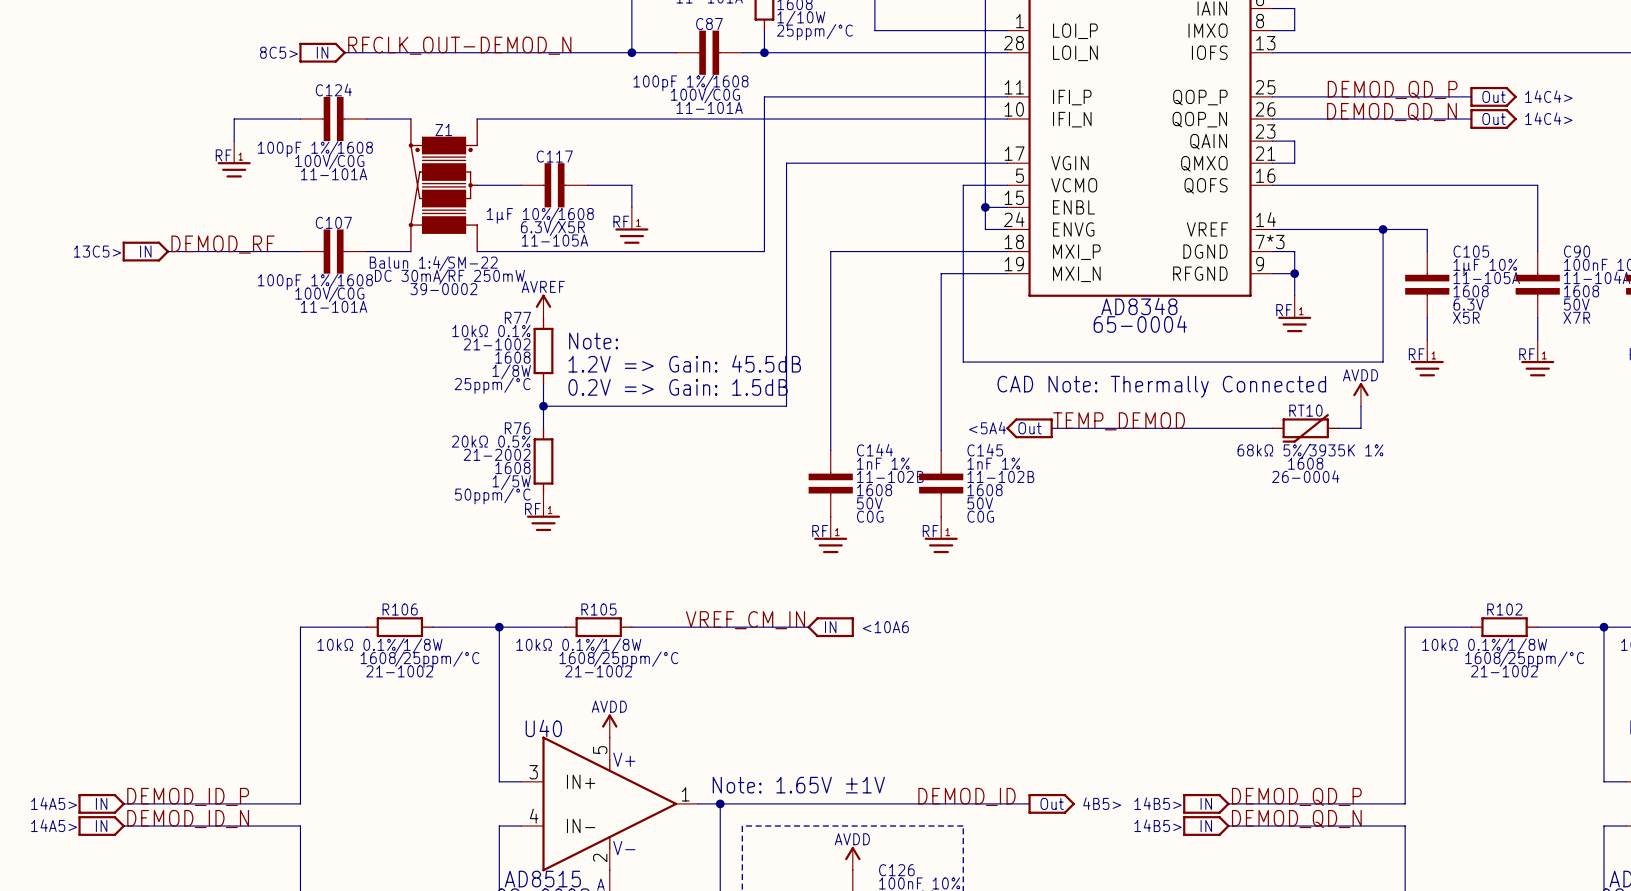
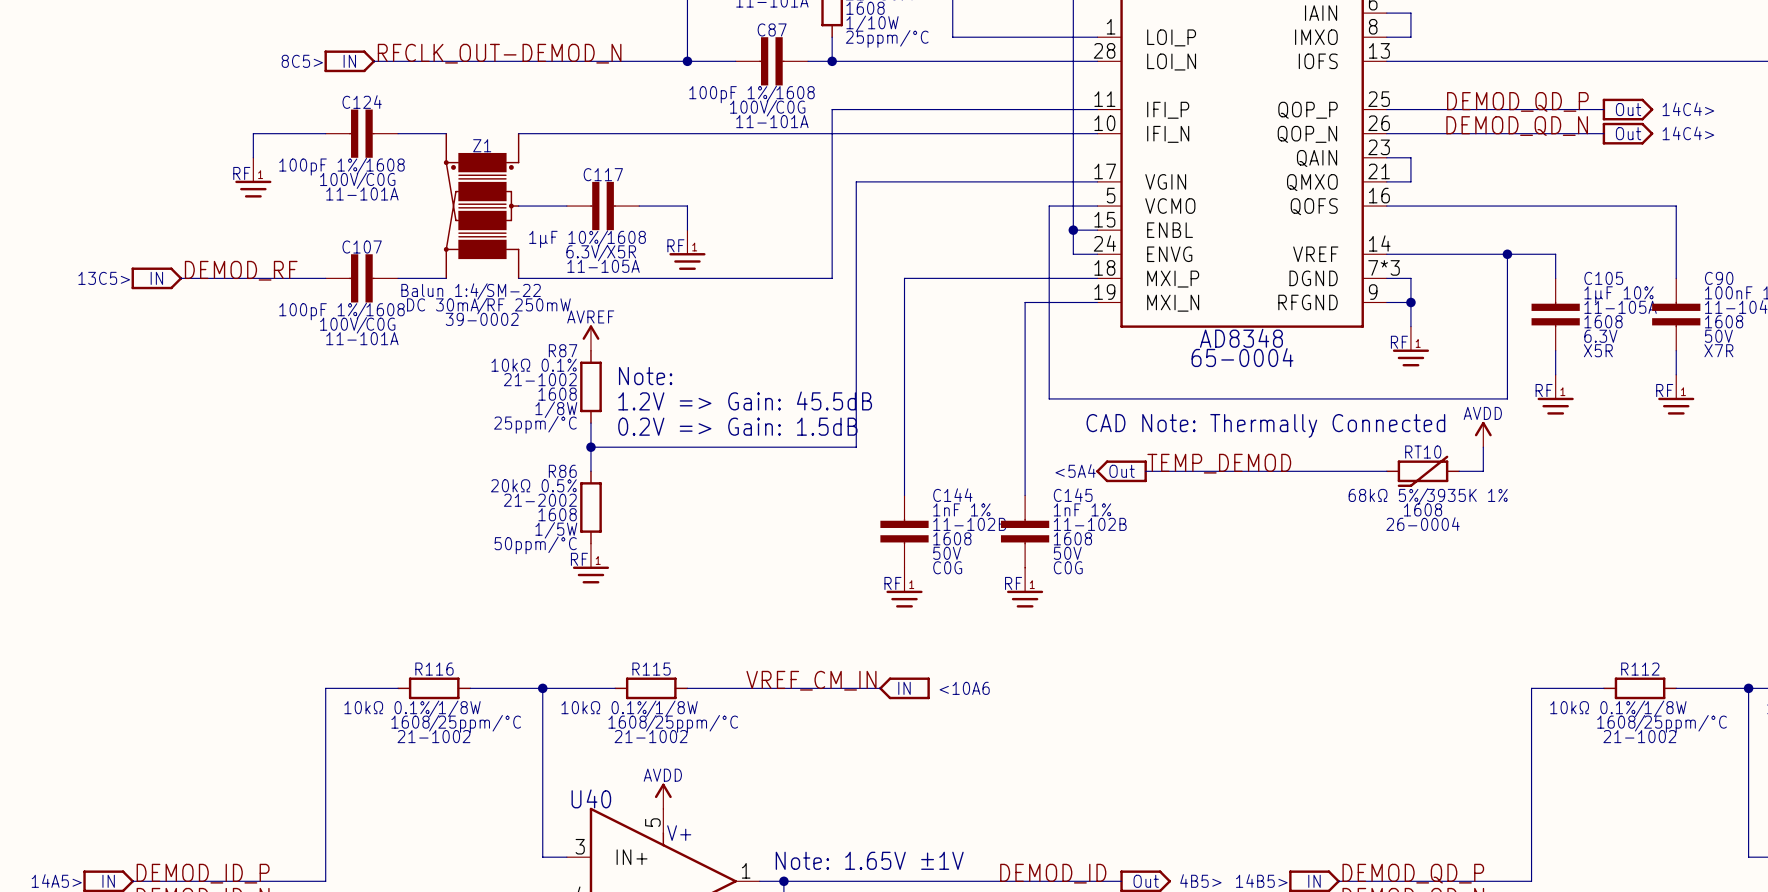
R77 name: R77 (517, 317) -> R87 (563, 350)
R76 name: R76 (517, 428) -> R86 (562, 471)
R106 name: R106 (400, 609) -> R116 (434, 669)
R105 name: R105 (598, 609) -> R115 (651, 669)
R102 name: R102 (1504, 609) -> R112 (1640, 669)

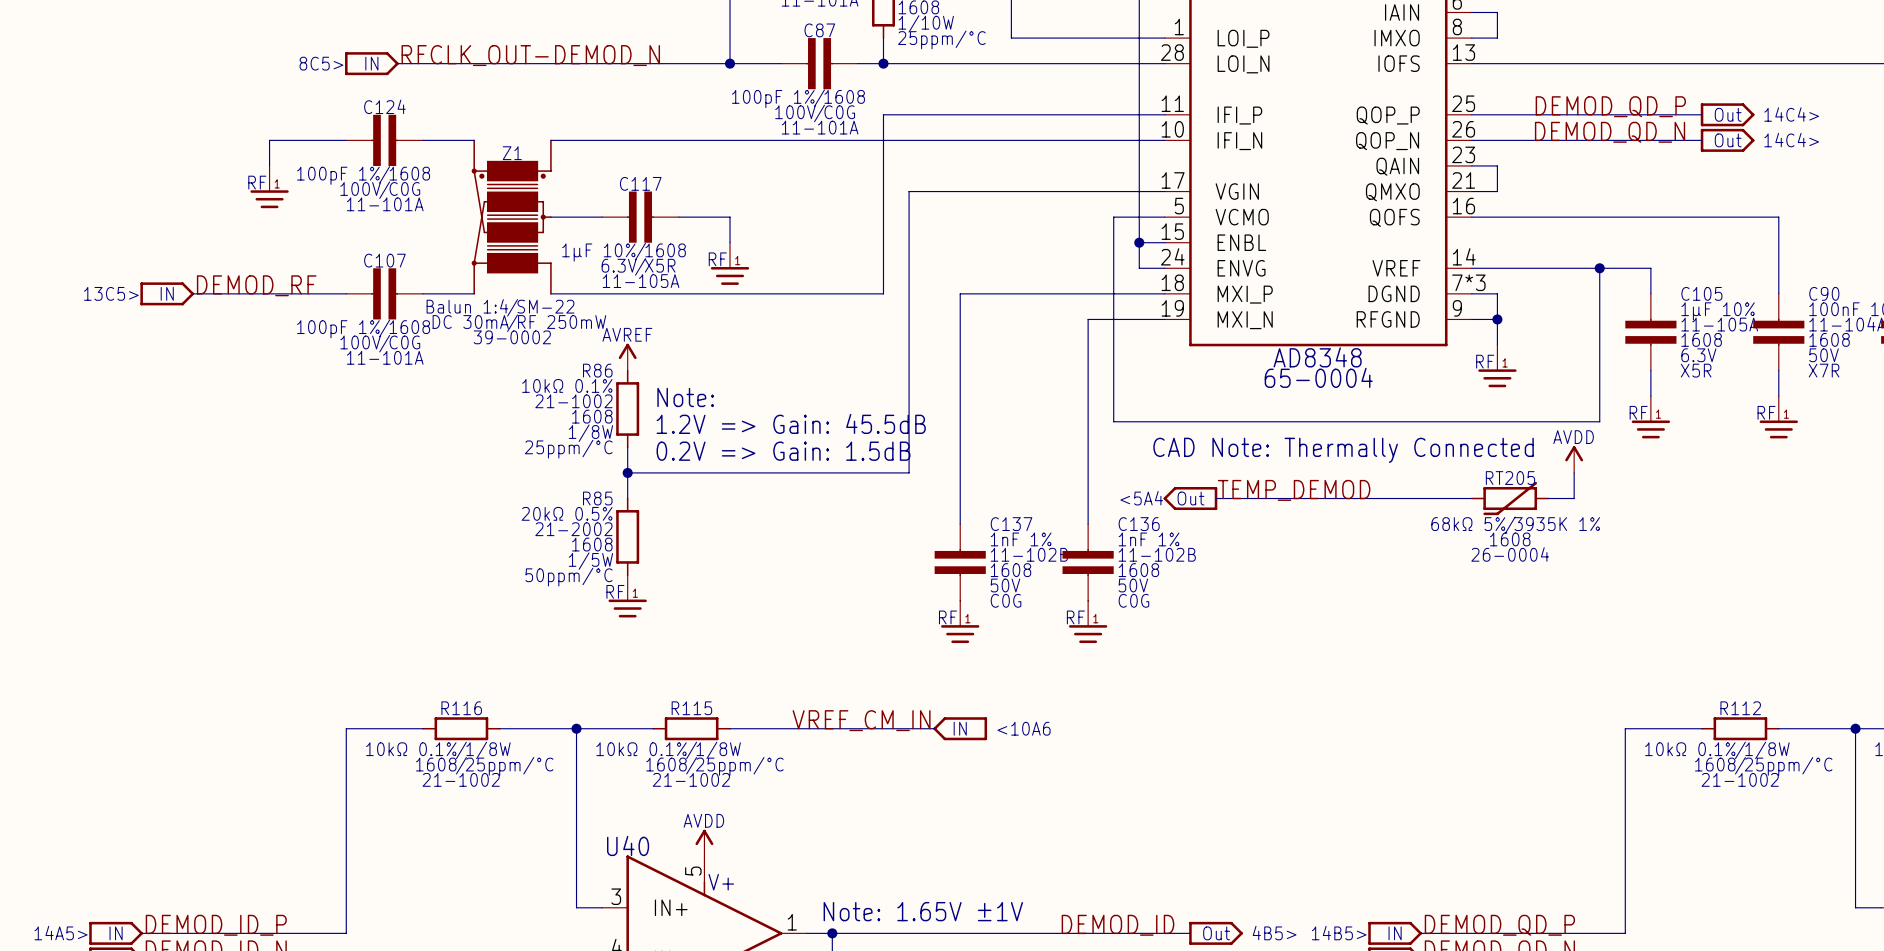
R87 name: R87 (563, 350) -> R86 (597, 370)
RT10 name: RT10 (1423, 452) -> RT205 (1510, 478)
R86 name: R86 (562, 471) -> R85 (597, 498)
C144 name: C144 (952, 495) -> C137 (1011, 524)
C145 name: C145 (1073, 495) -> C136 (1139, 524)

